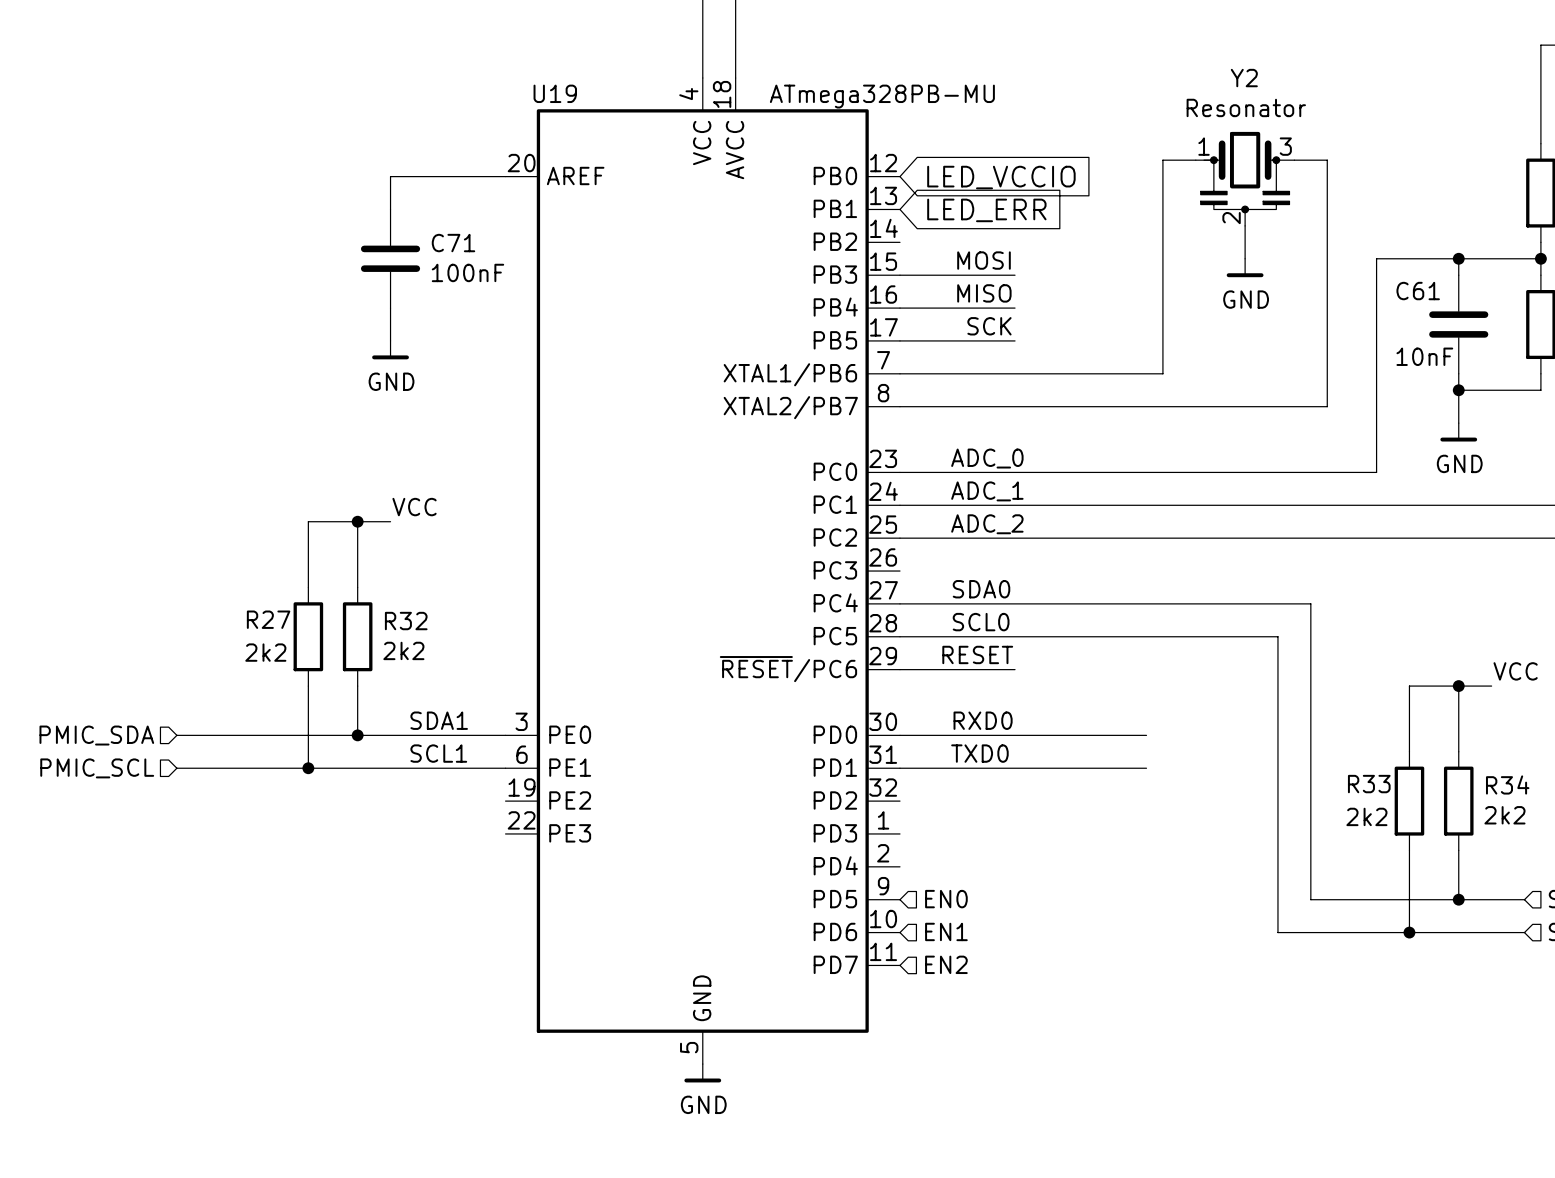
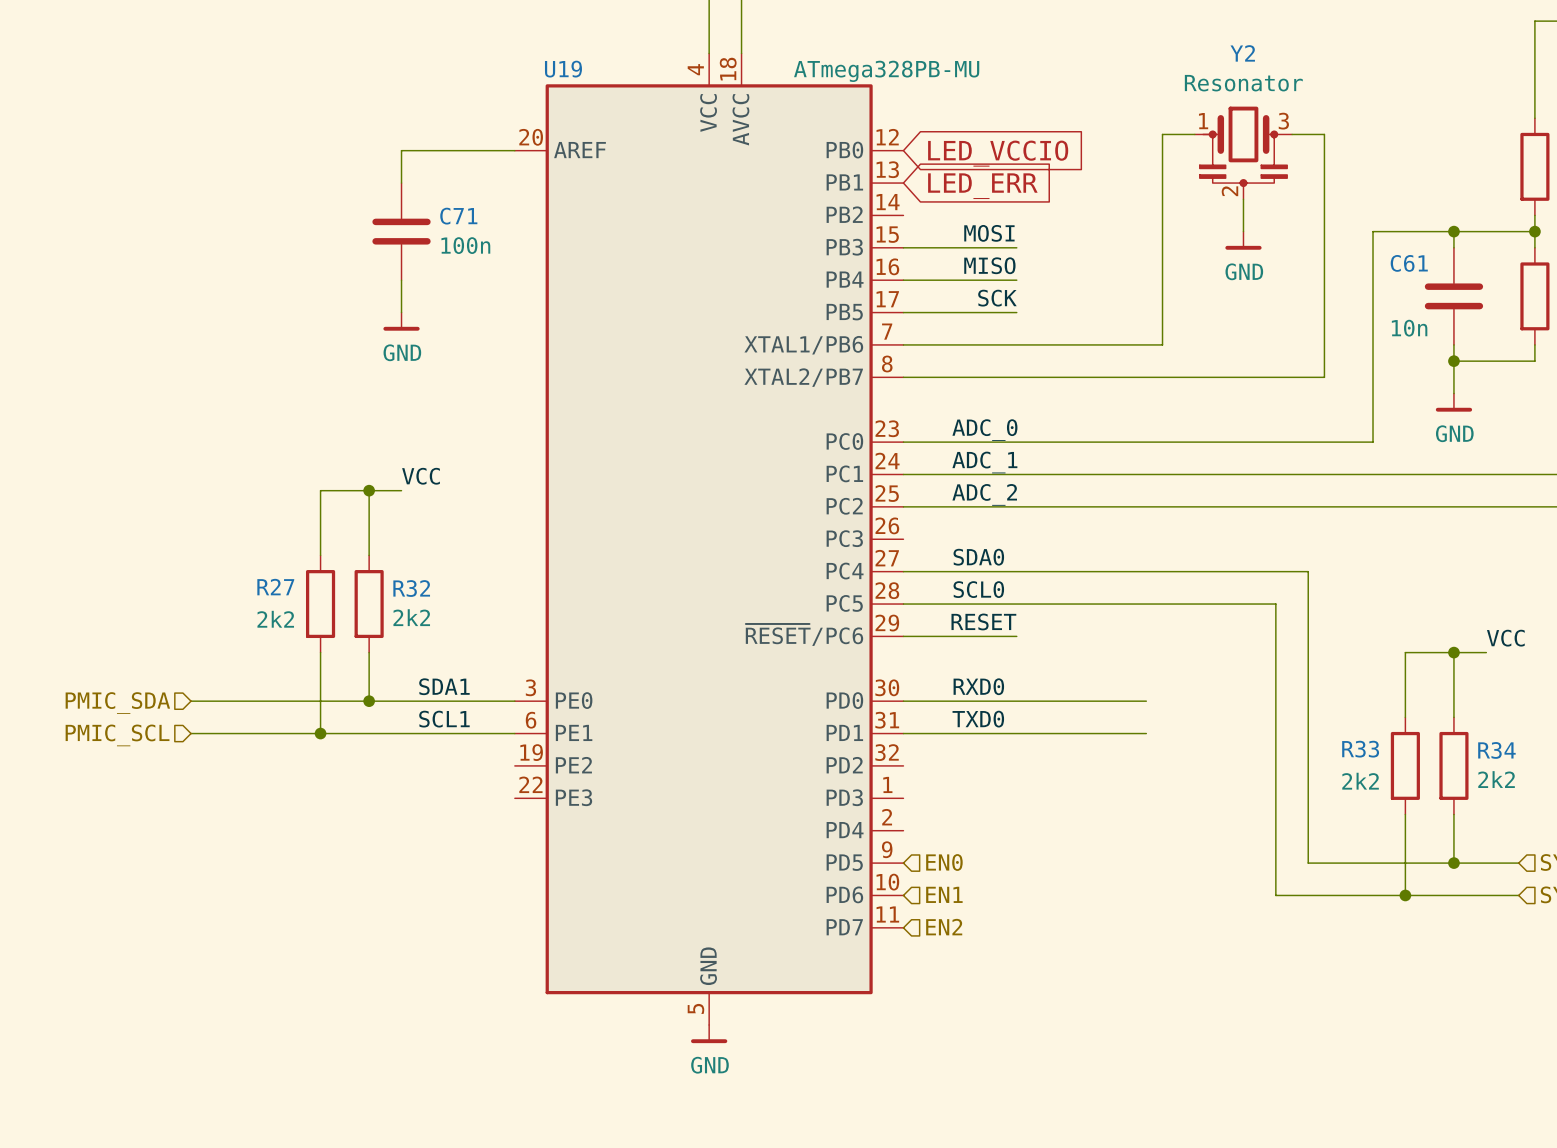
C71 value: 100nF (467, 272) -> 100n (465, 245)
C61 value: 10nF (1424, 356) -> 10n (1409, 328)

